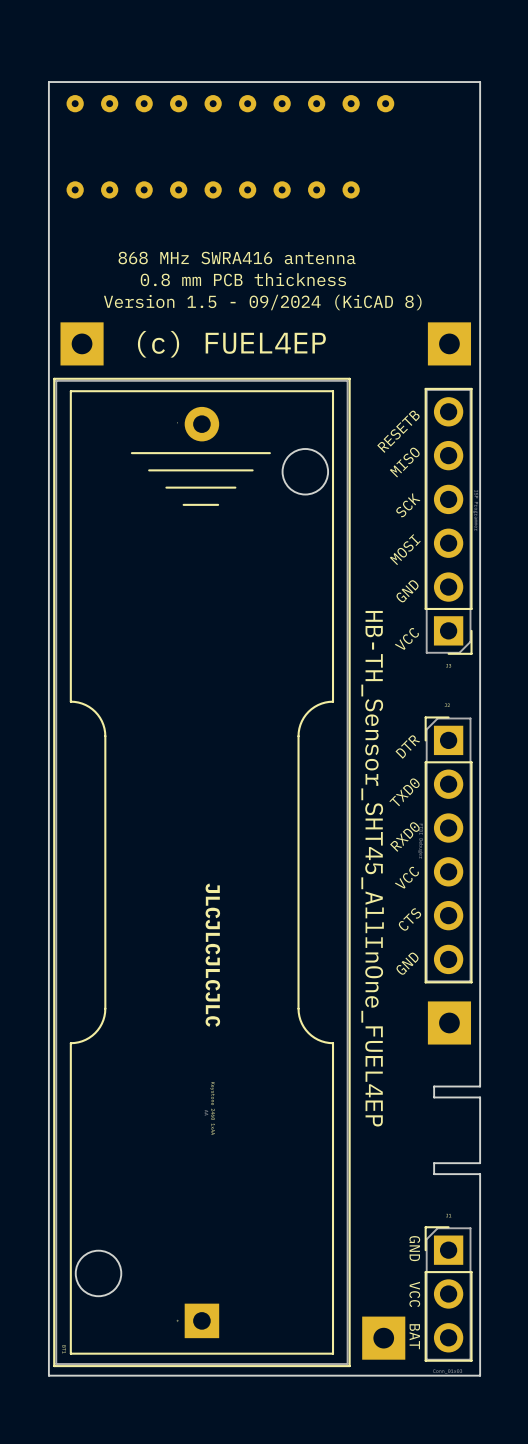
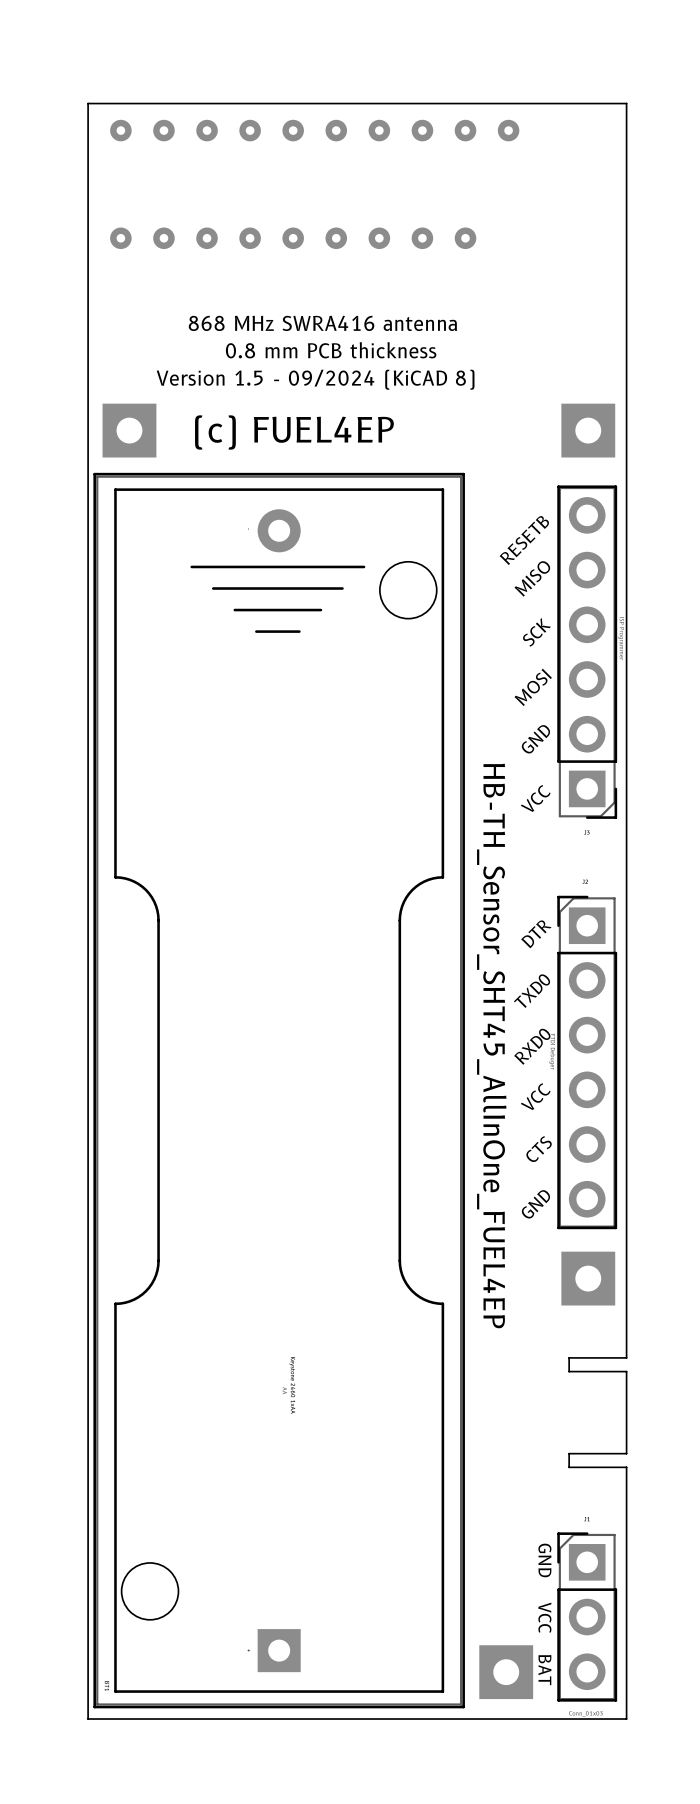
text: JLCJLCJLCJLC (212, 955) -> none

